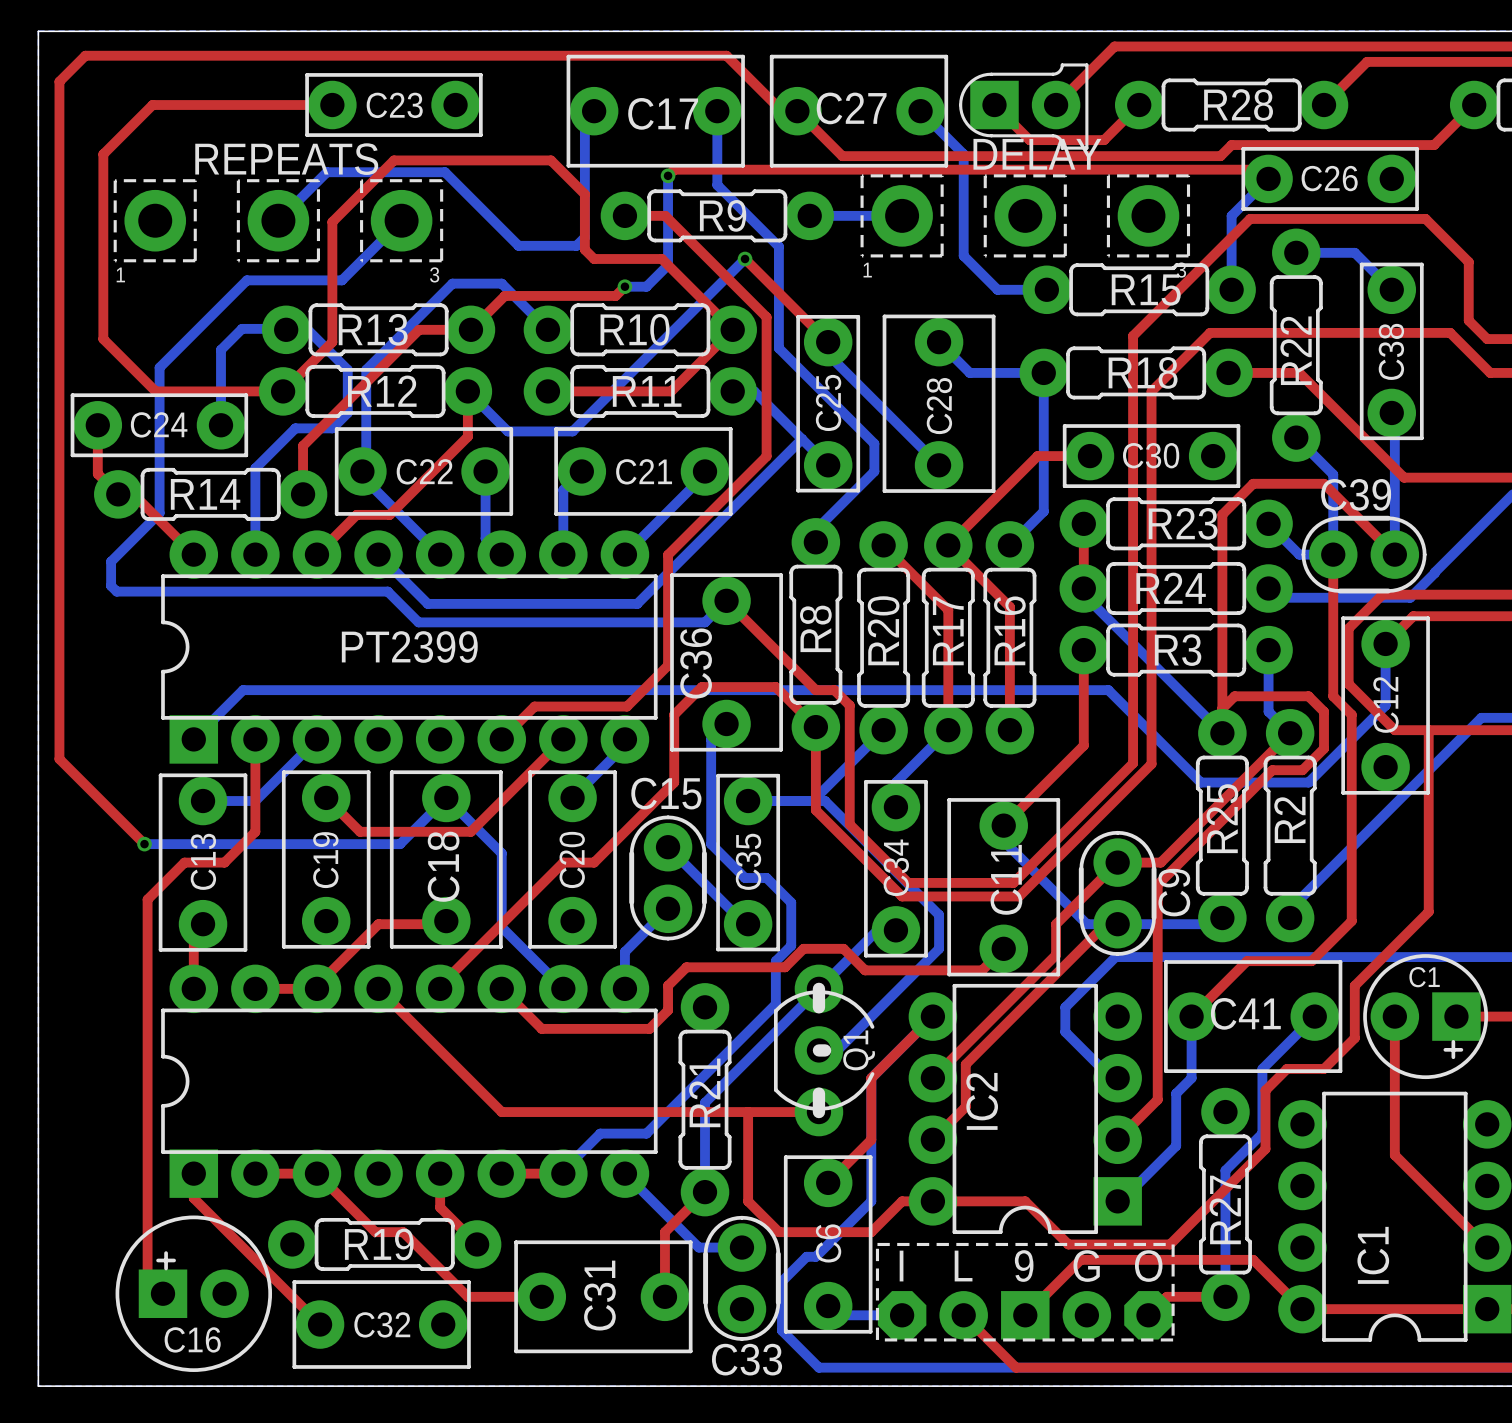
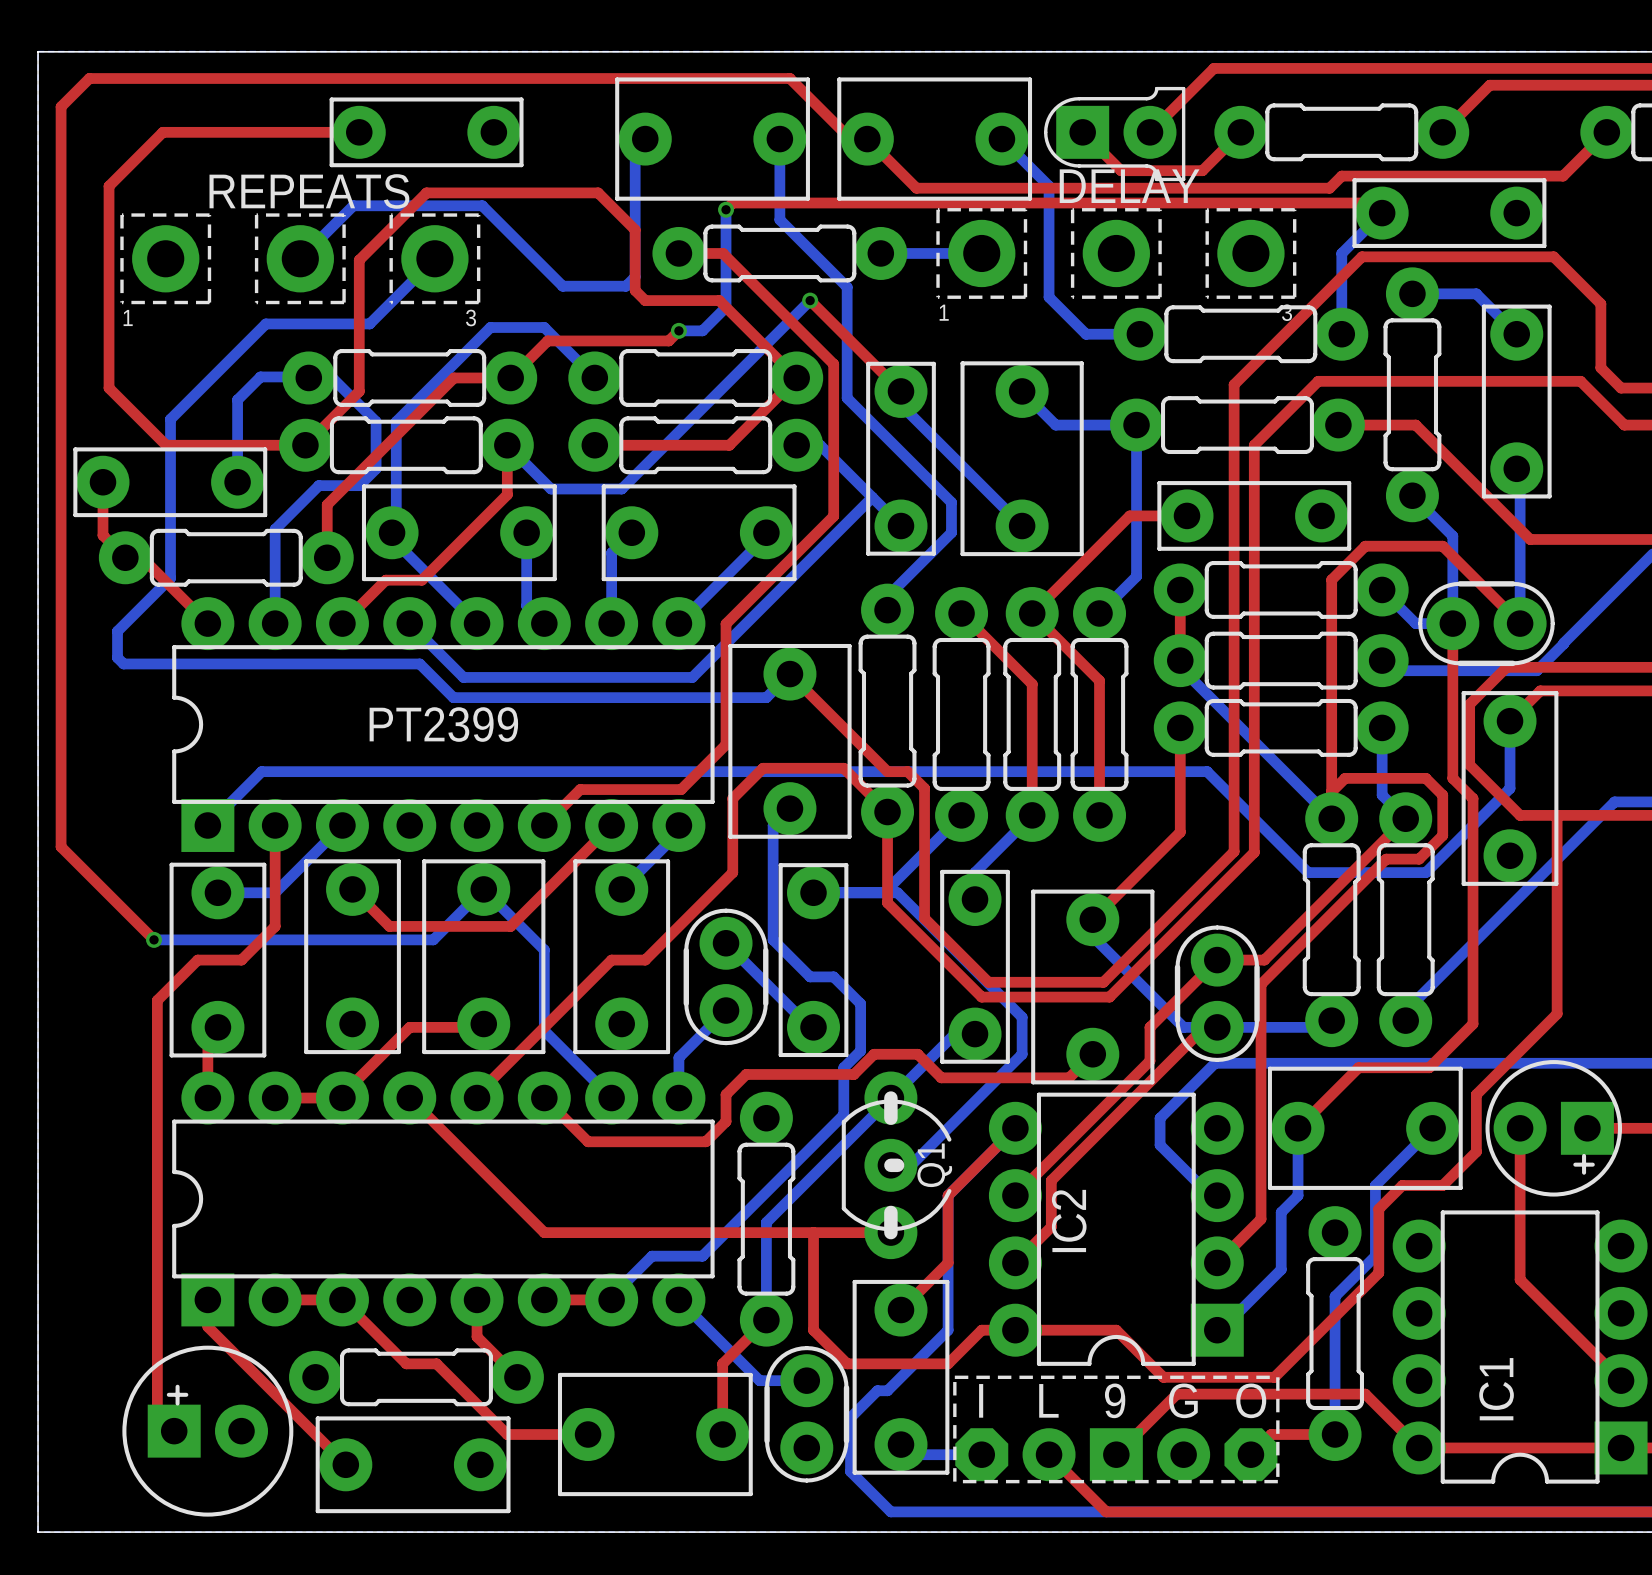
C23 name: C23 (394, 105) -> none
R28 name: R28 (1238, 105) -> none
C27 name: C27 (851, 108) -> none
C17 name: C17 (663, 113) -> none
C26 name: C26 (1329, 178) -> none
R9 name: R9 (723, 215) -> none
R15 name: R15 (1146, 290) -> none
R13 name: R13 (373, 329) -> none
R10 name: R10 (635, 329) -> none
R22 name: R22 (1296, 350) -> none
C38 name: C38 (1391, 351) -> none
R18 name: R18 (1143, 372) -> none
R12 name: R12 (382, 391) -> none
R11 name: R11 (647, 391) -> none
C25 name: C25 (828, 402) -> none
C28 name: C28 (939, 406) -> none
C24 name: C24 (159, 424) -> none
C30 name: C30 (1151, 455) -> none
C22 name: C22 (424, 471) -> none
C21 name: C21 (644, 471) -> none
R14 name: R14 (205, 494) -> none
C39 name: C39 (1356, 494) -> none
R23 name: R23 (1183, 523) -> none
R24 name: R24 (1171, 588) -> none
R8 name: R8 (815, 628) -> none
R20 name: R20 (883, 630) -> none
R17 name: R17 (948, 630) -> none
R16 name: R16 (1009, 630) -> none
R3 name: R3 (1178, 650) -> none
C36 name: C36 (696, 663) -> none
C12 name: C12 (1385, 704) -> none
C15 name: C15 (666, 793) -> none
R25 name: R25 (1222, 818) -> none
R2 name: R2 (1289, 819) -> none
C20 name: C20 (572, 859) -> none
C19 name: C19 (325, 860) -> none
C13 name: C13 (203, 861) -> none
C35 name: C35 (748, 861) -> none
C18 name: C18 (443, 866) -> none
C34 name: C34 (896, 867) -> none
C11 name: C11 (1006, 879) -> none
C9 name: C9 (1174, 892) -> none
C1 name: C1 (1424, 977) -> none
C41 name: C41 (1245, 1013) -> none
R21 name: R21 (704, 1092) -> none
R27 name: R27 (1225, 1209) -> none
C6 name: C6 (828, 1243) -> none
R19 name: R19 (379, 1244) -> none
C31 name: C31 (599, 1295) -> none
C32 name: C32 (382, 1324) -> none
C16 name: C16 (192, 1339) -> none
C33 name: C33 (747, 1359) -> none

